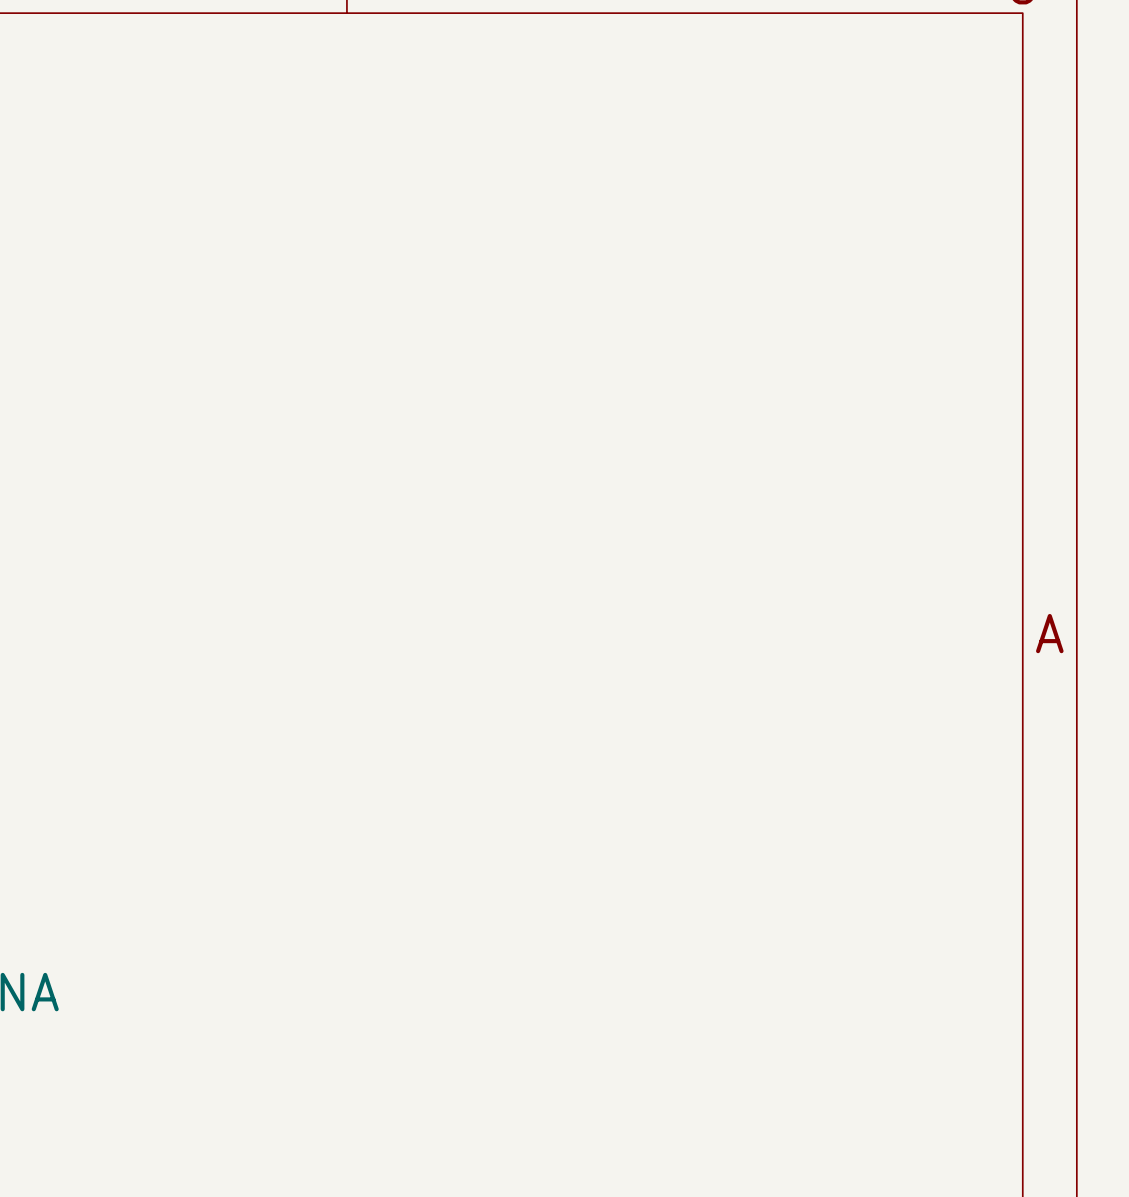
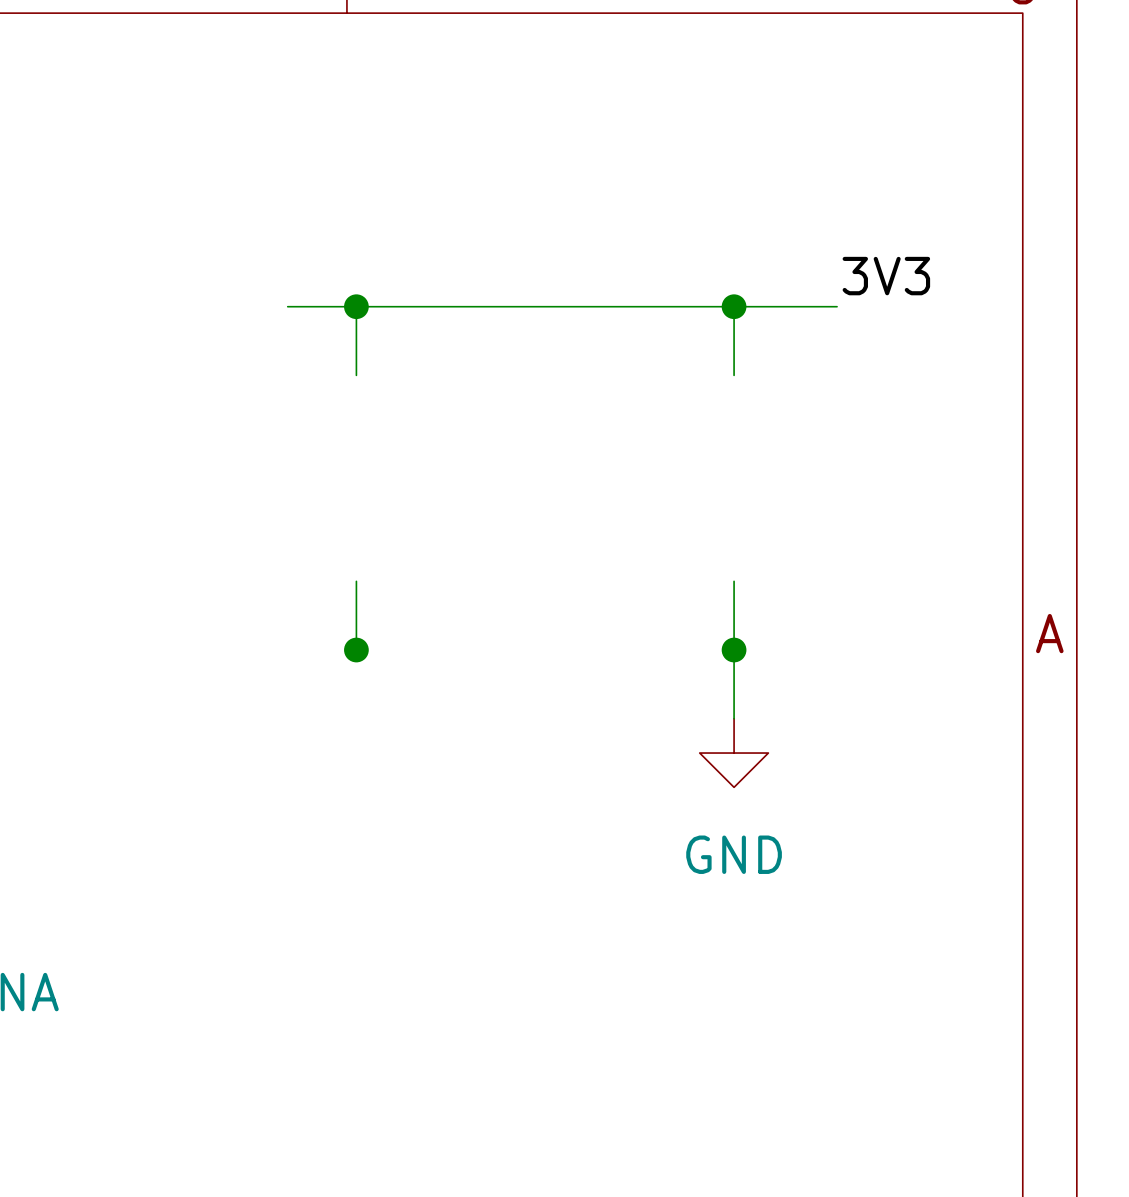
label: none -> 3V3 (886, 276)
wire: none -> (287, 306) (837, 306)
wire: none -> (356, 306) (356, 375)
junction: none -> (356, 306)
wire: none -> (734, 306) (734, 375)
junction: none -> (734, 306)
wire: none -> (356, 581) (356, 650)
wire: none -> (734, 581) (734, 718)
junction: none -> (356, 650)
junction: none -> (734, 650)
power symbol: none -> GND (734, 753)

